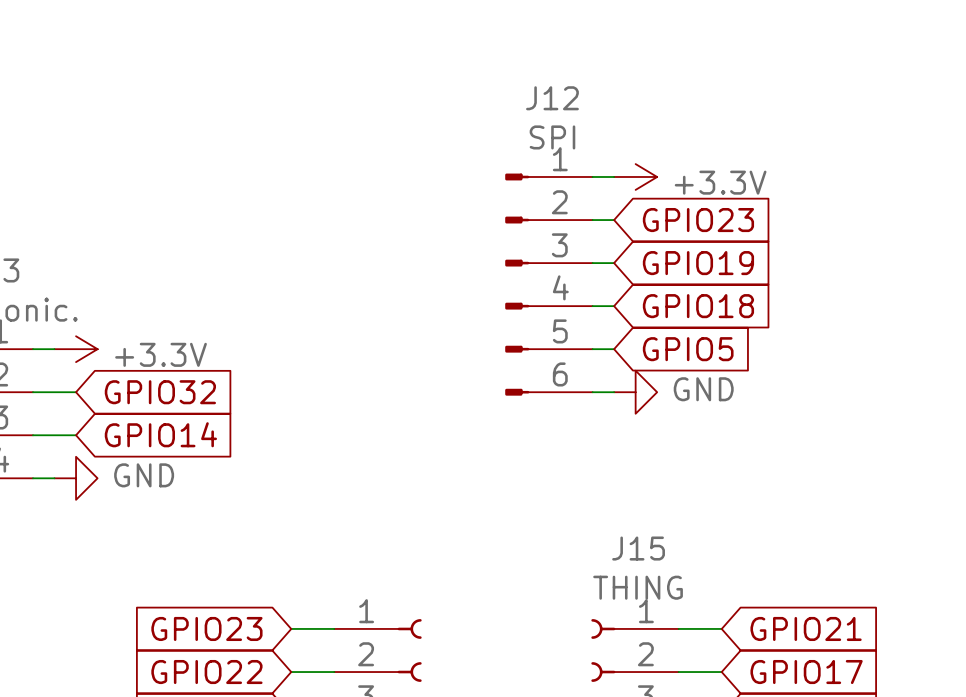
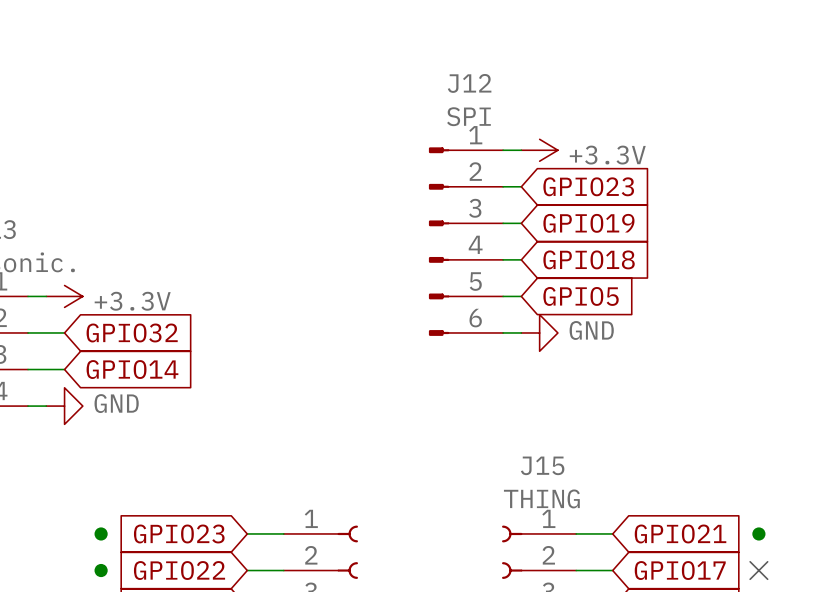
junction: none -> (101, 533)
junction: none -> (758, 533)
junction: none -> (101, 570)
no-connect mark: none -> (758, 570)

